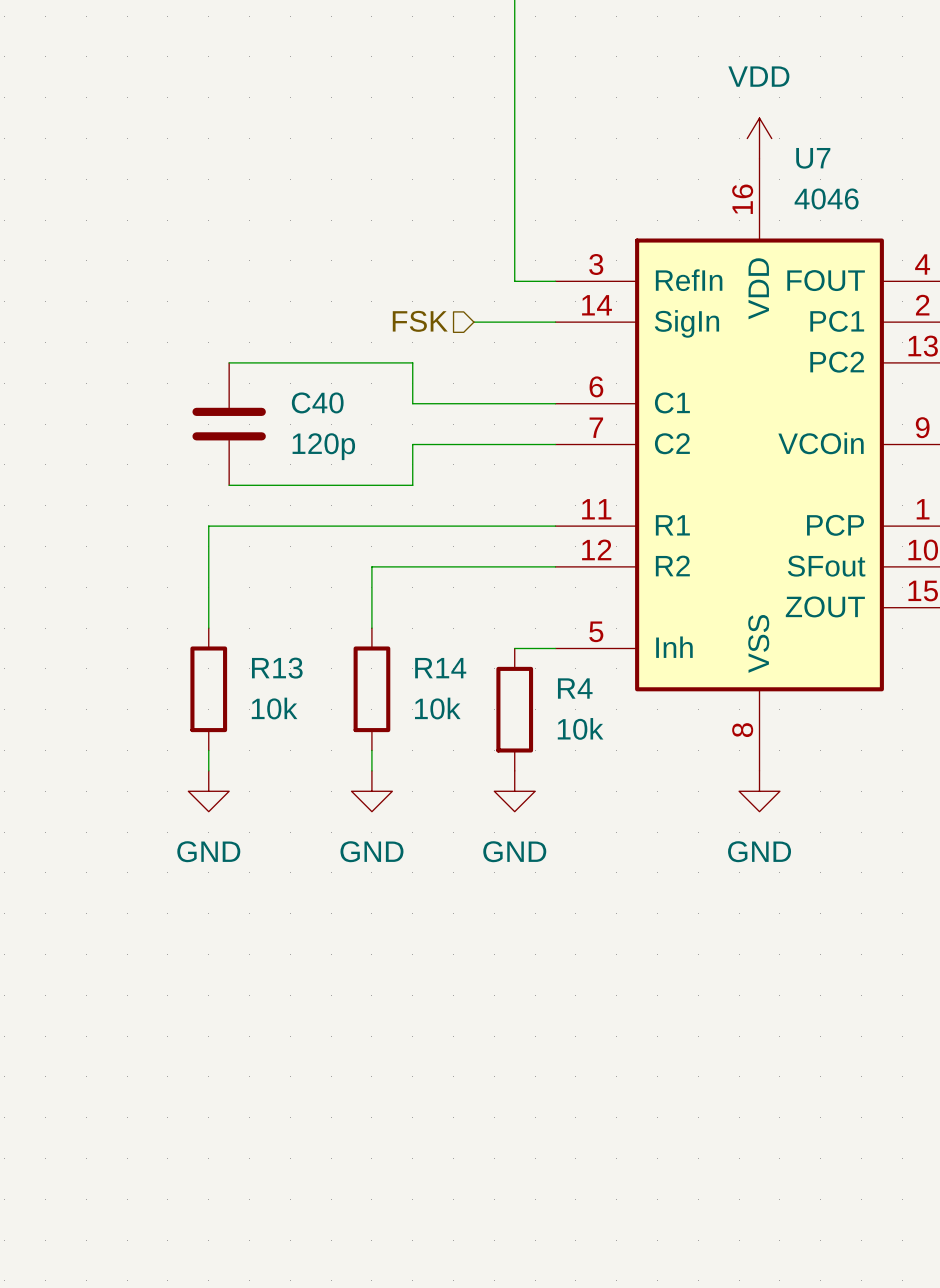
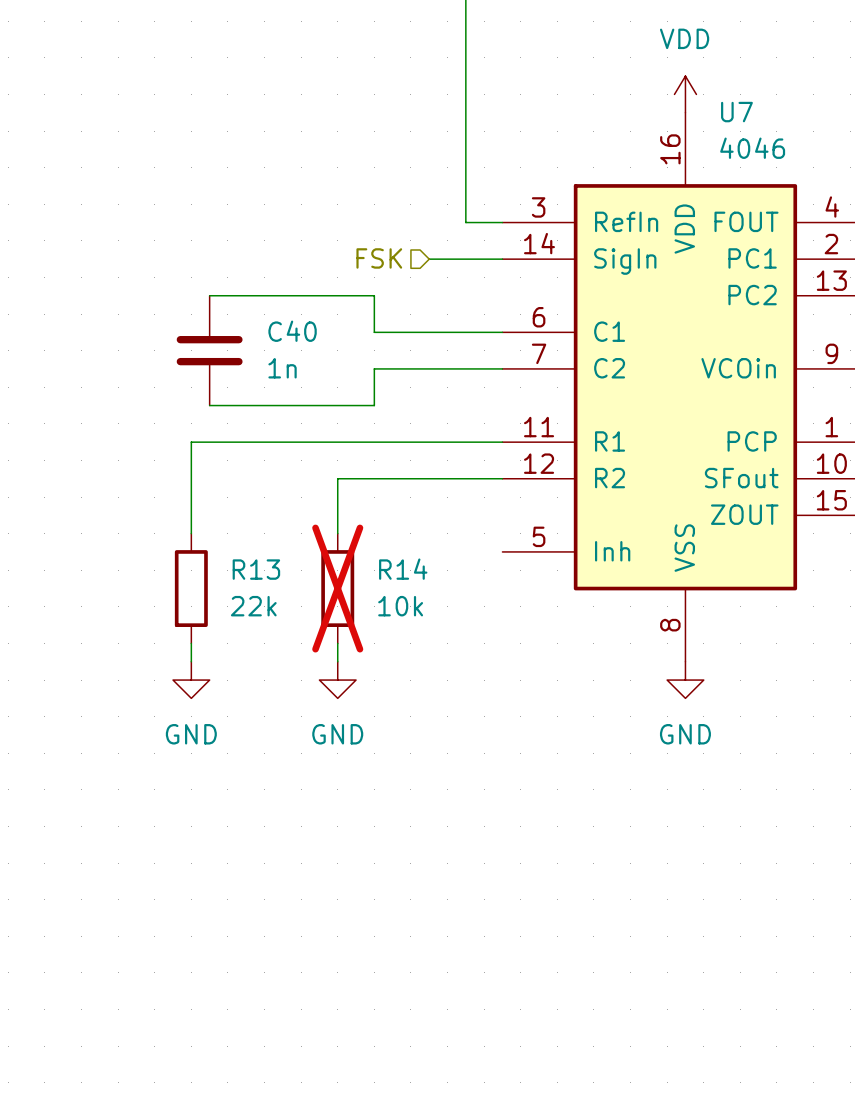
C40 value: 120p (323, 446) -> 1n (282, 368)
wire: (514, 648) (555, 648) -> none
R14 do-not-place cross: none -> (337, 588)
R13 value: 10k (274, 708) -> 22k (253, 606)
R4: 10k (514, 709) -> none
power symbol: GND (514, 791) -> none

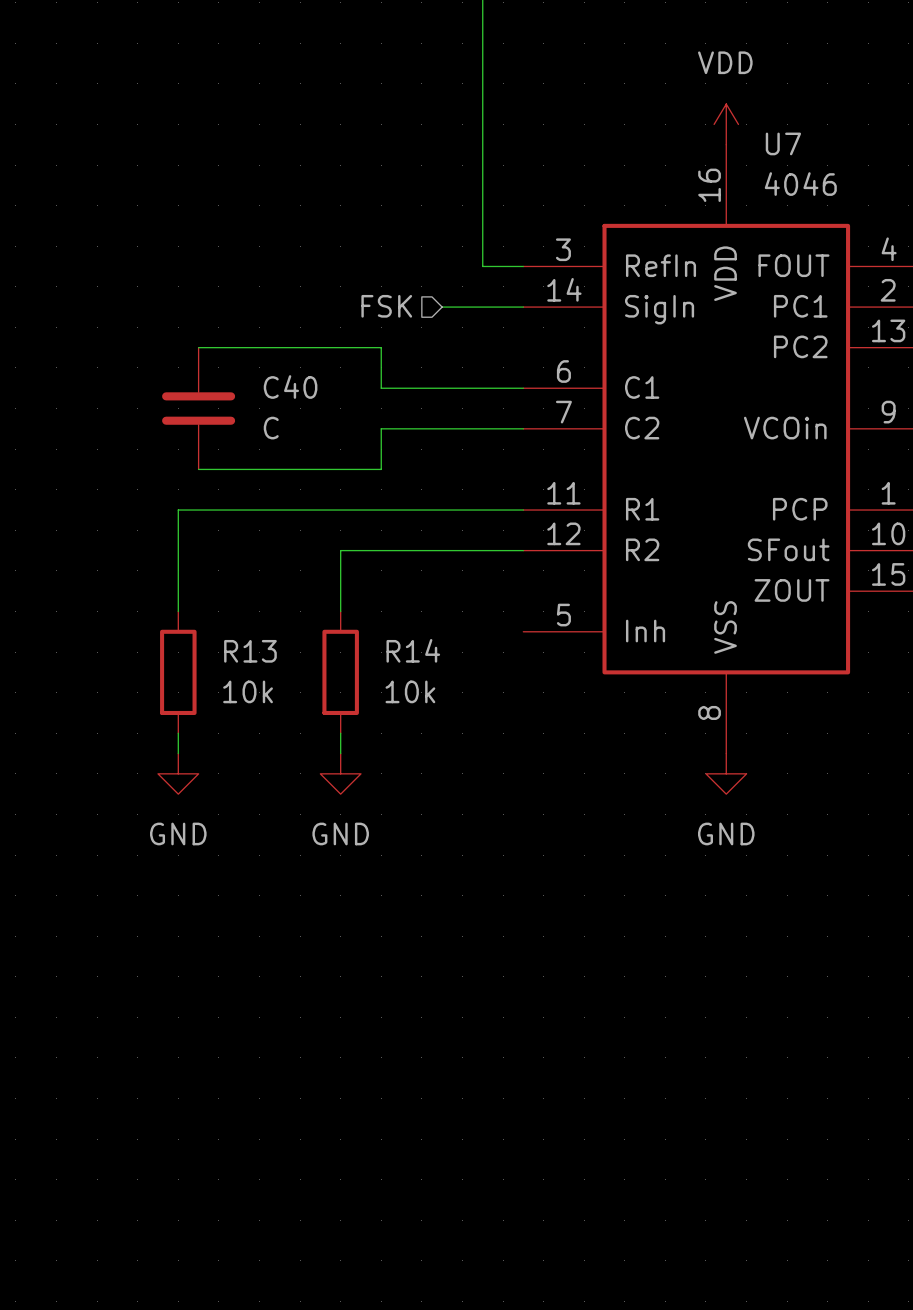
C40 value: 1n (282, 368) -> C (271, 428)
R14 do-not-place cross: (337, 588) -> none
R13 value: 22k (253, 606) -> 10k (248, 691)

